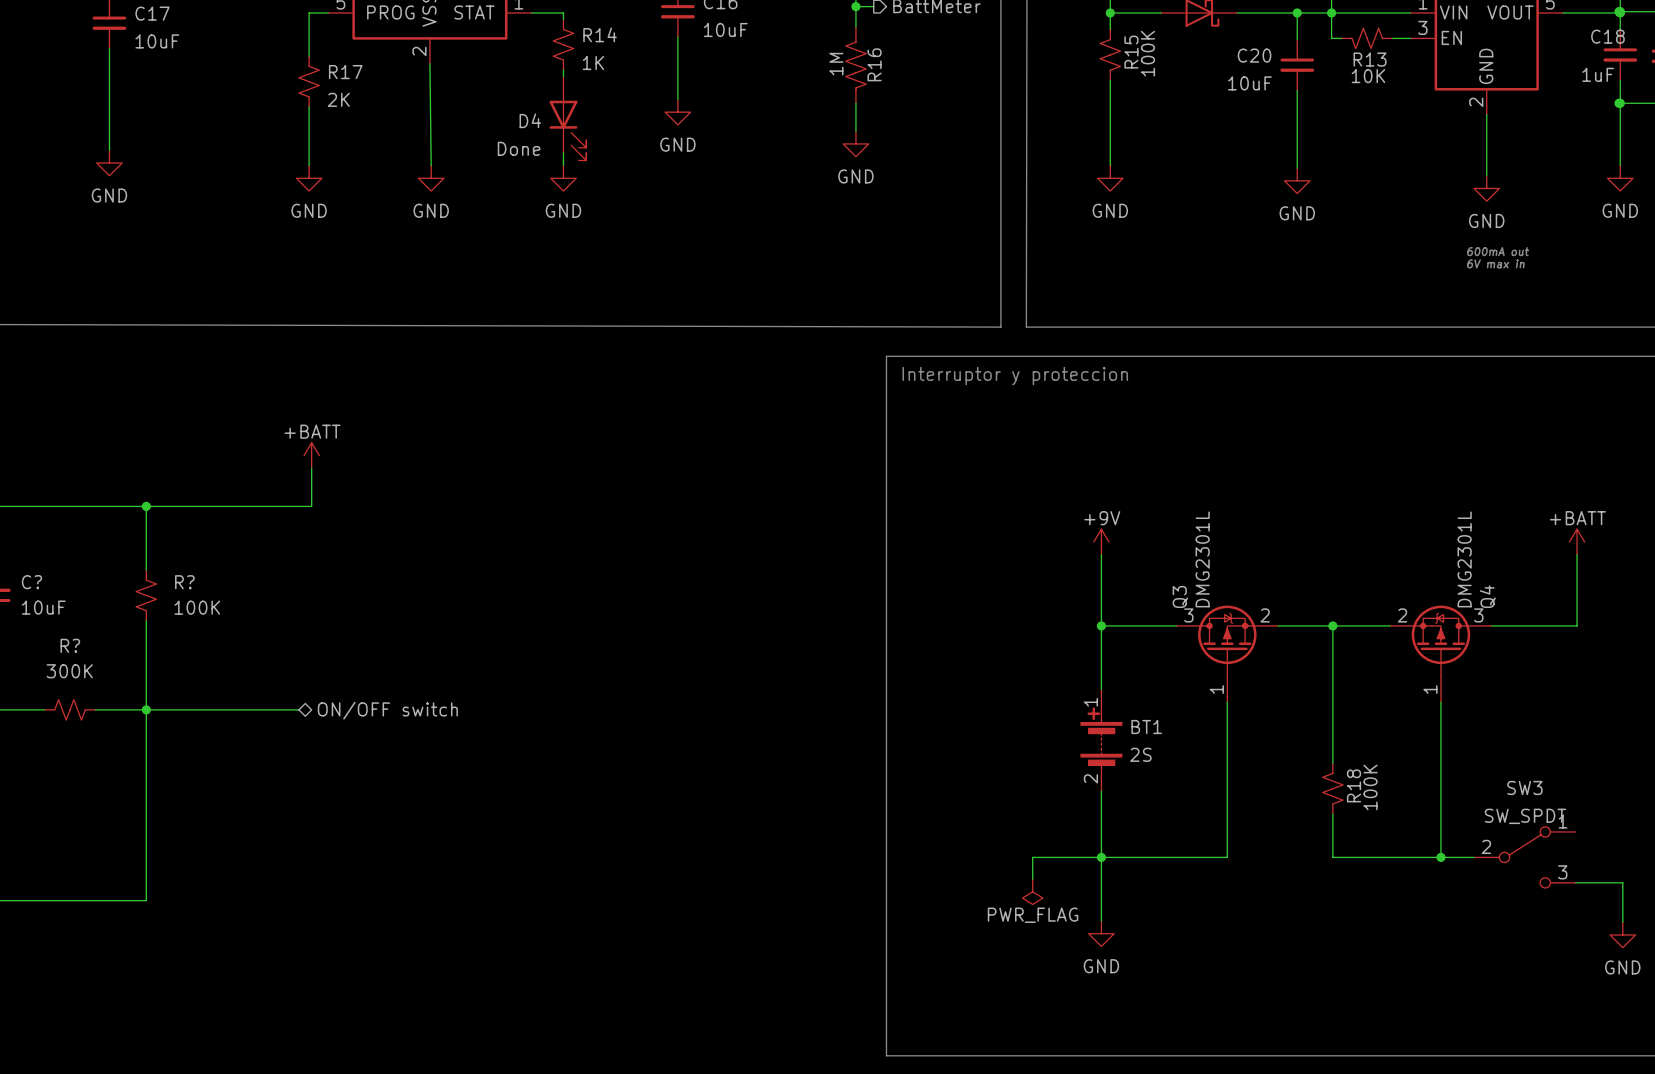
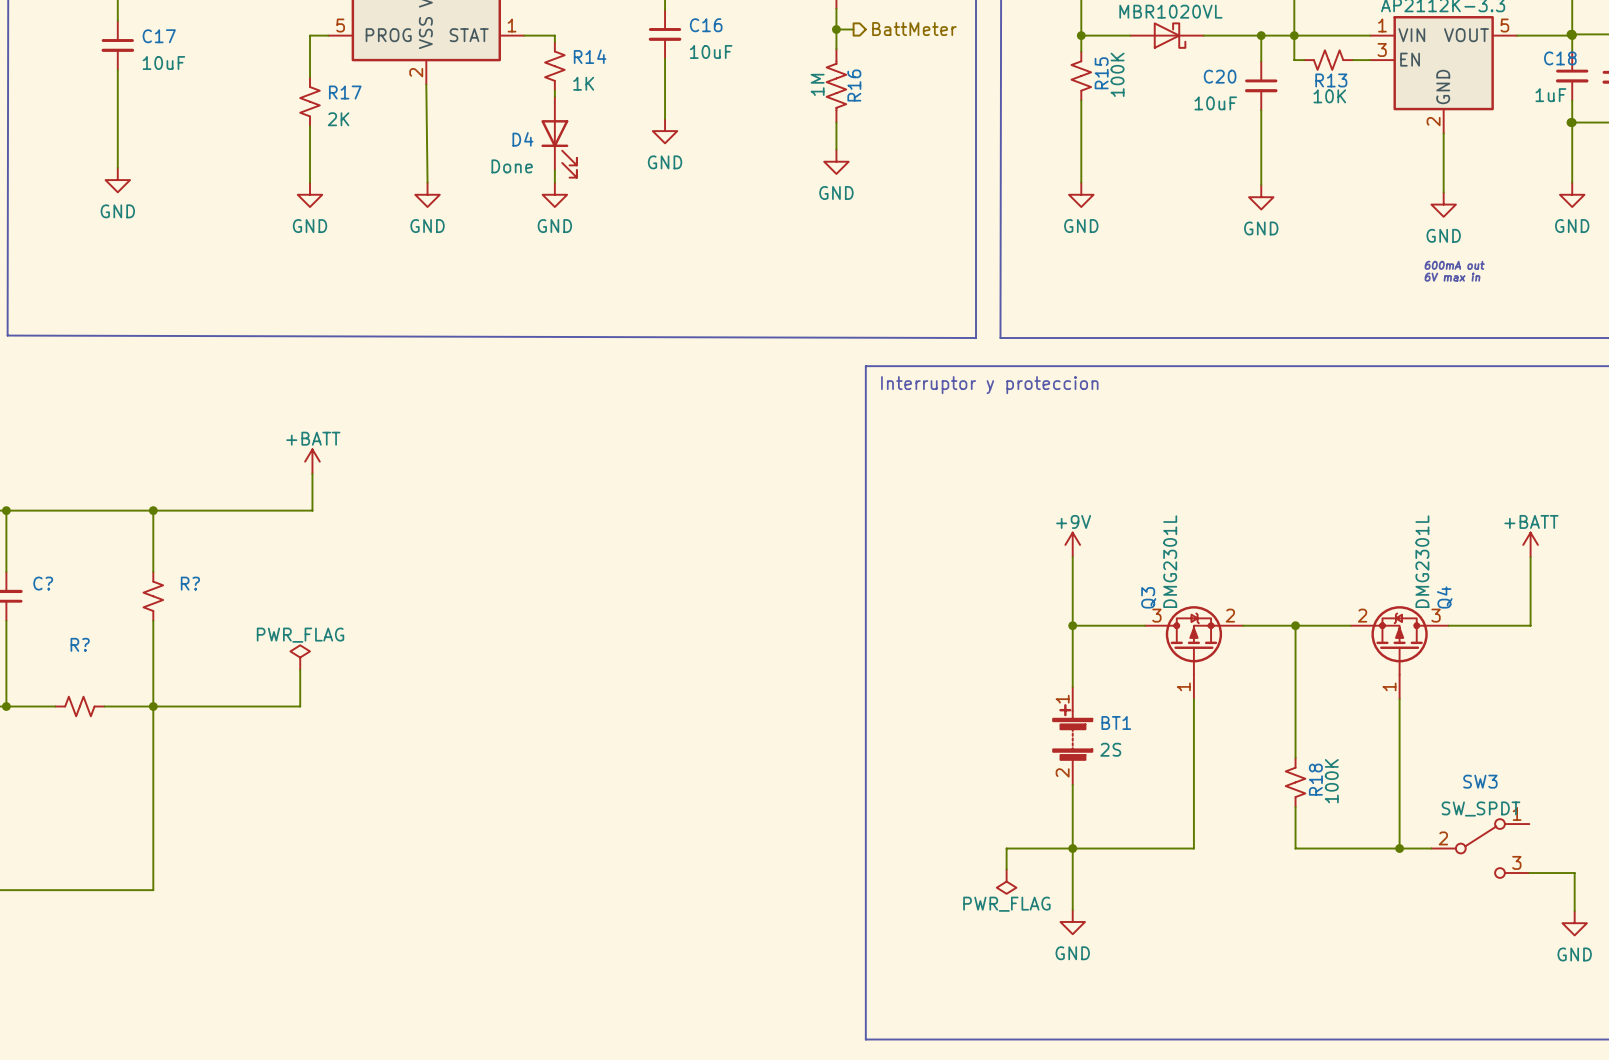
C? value: 10uF (43, 607) -> none
R? value: 100K (197, 607) -> none
power symbol: none -> PWR_FLAG (300, 657)
R? value: 300K (69, 671) -> none
wire: none -> (300, 669) (300, 706)
hierarchical label: ON/OFF switch (387, 710) -> none

